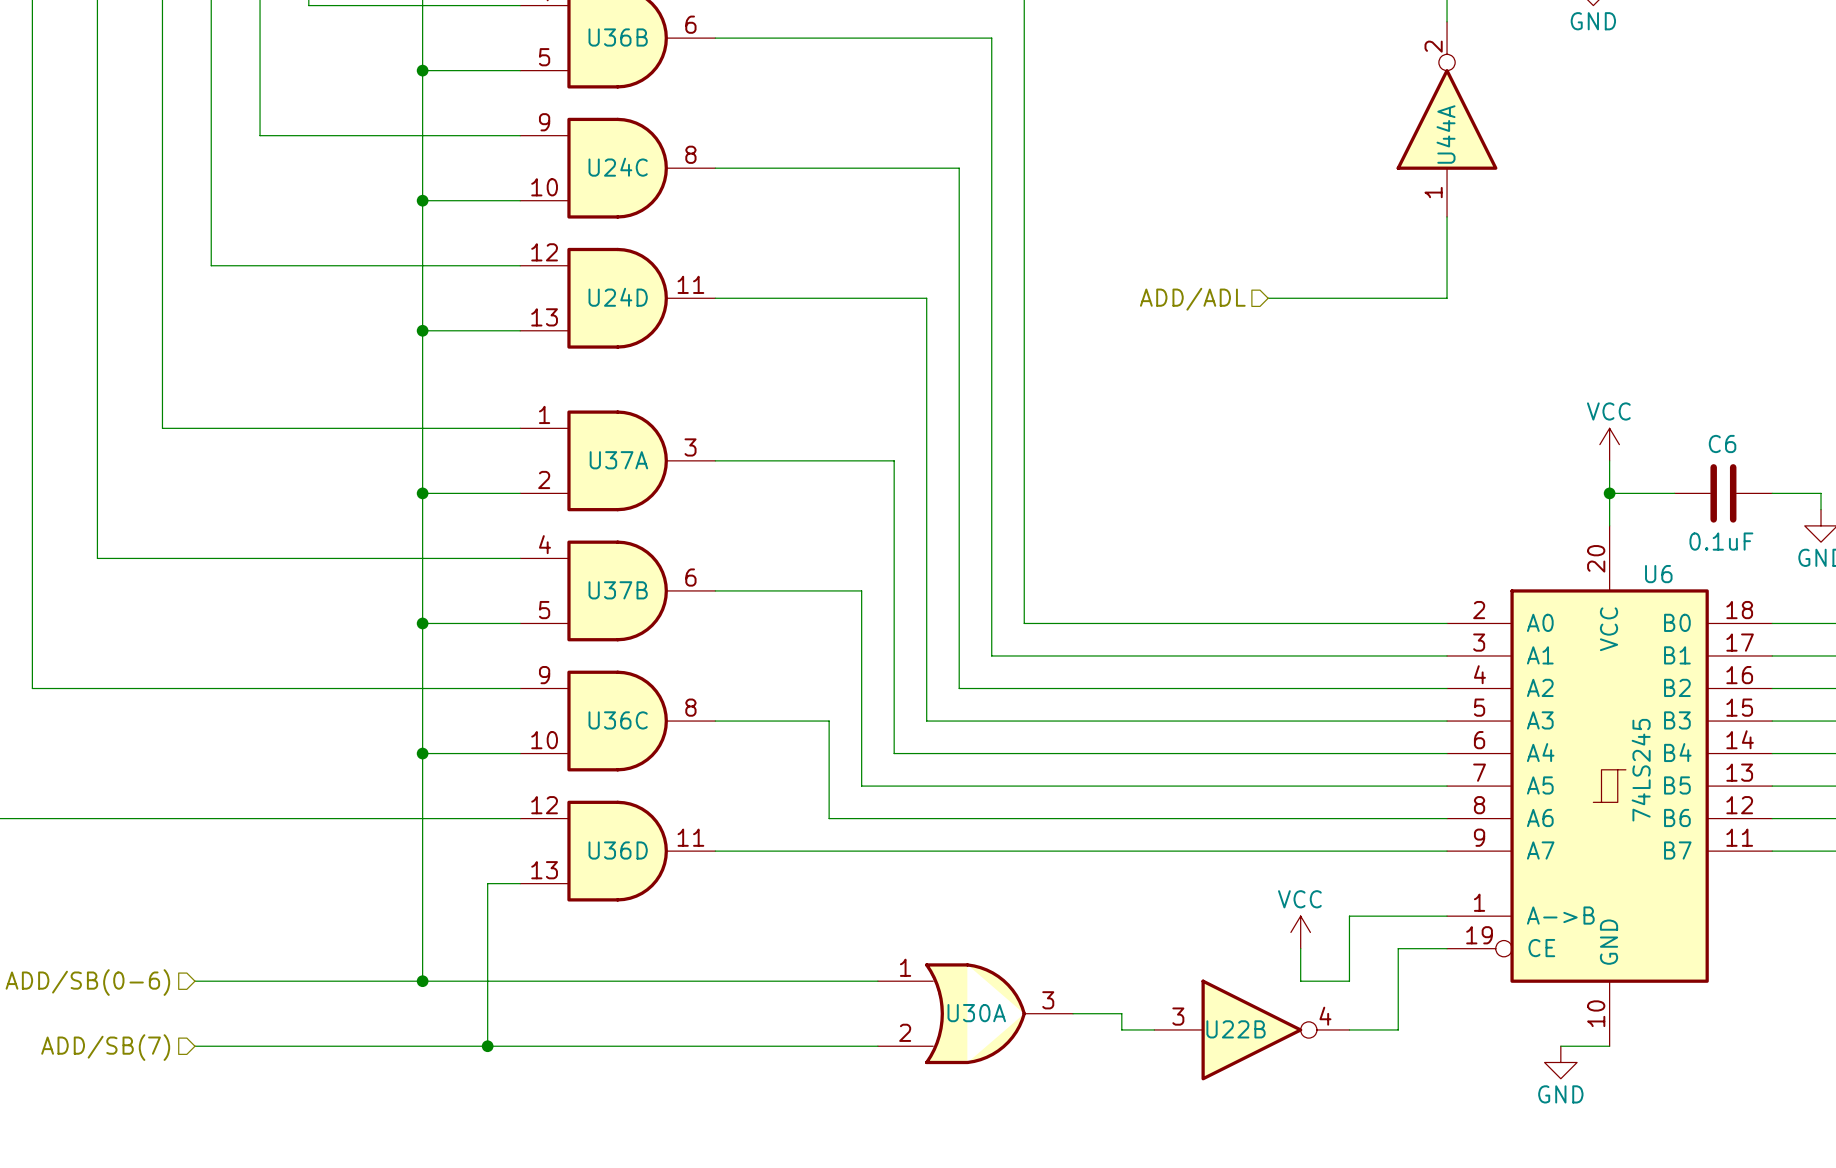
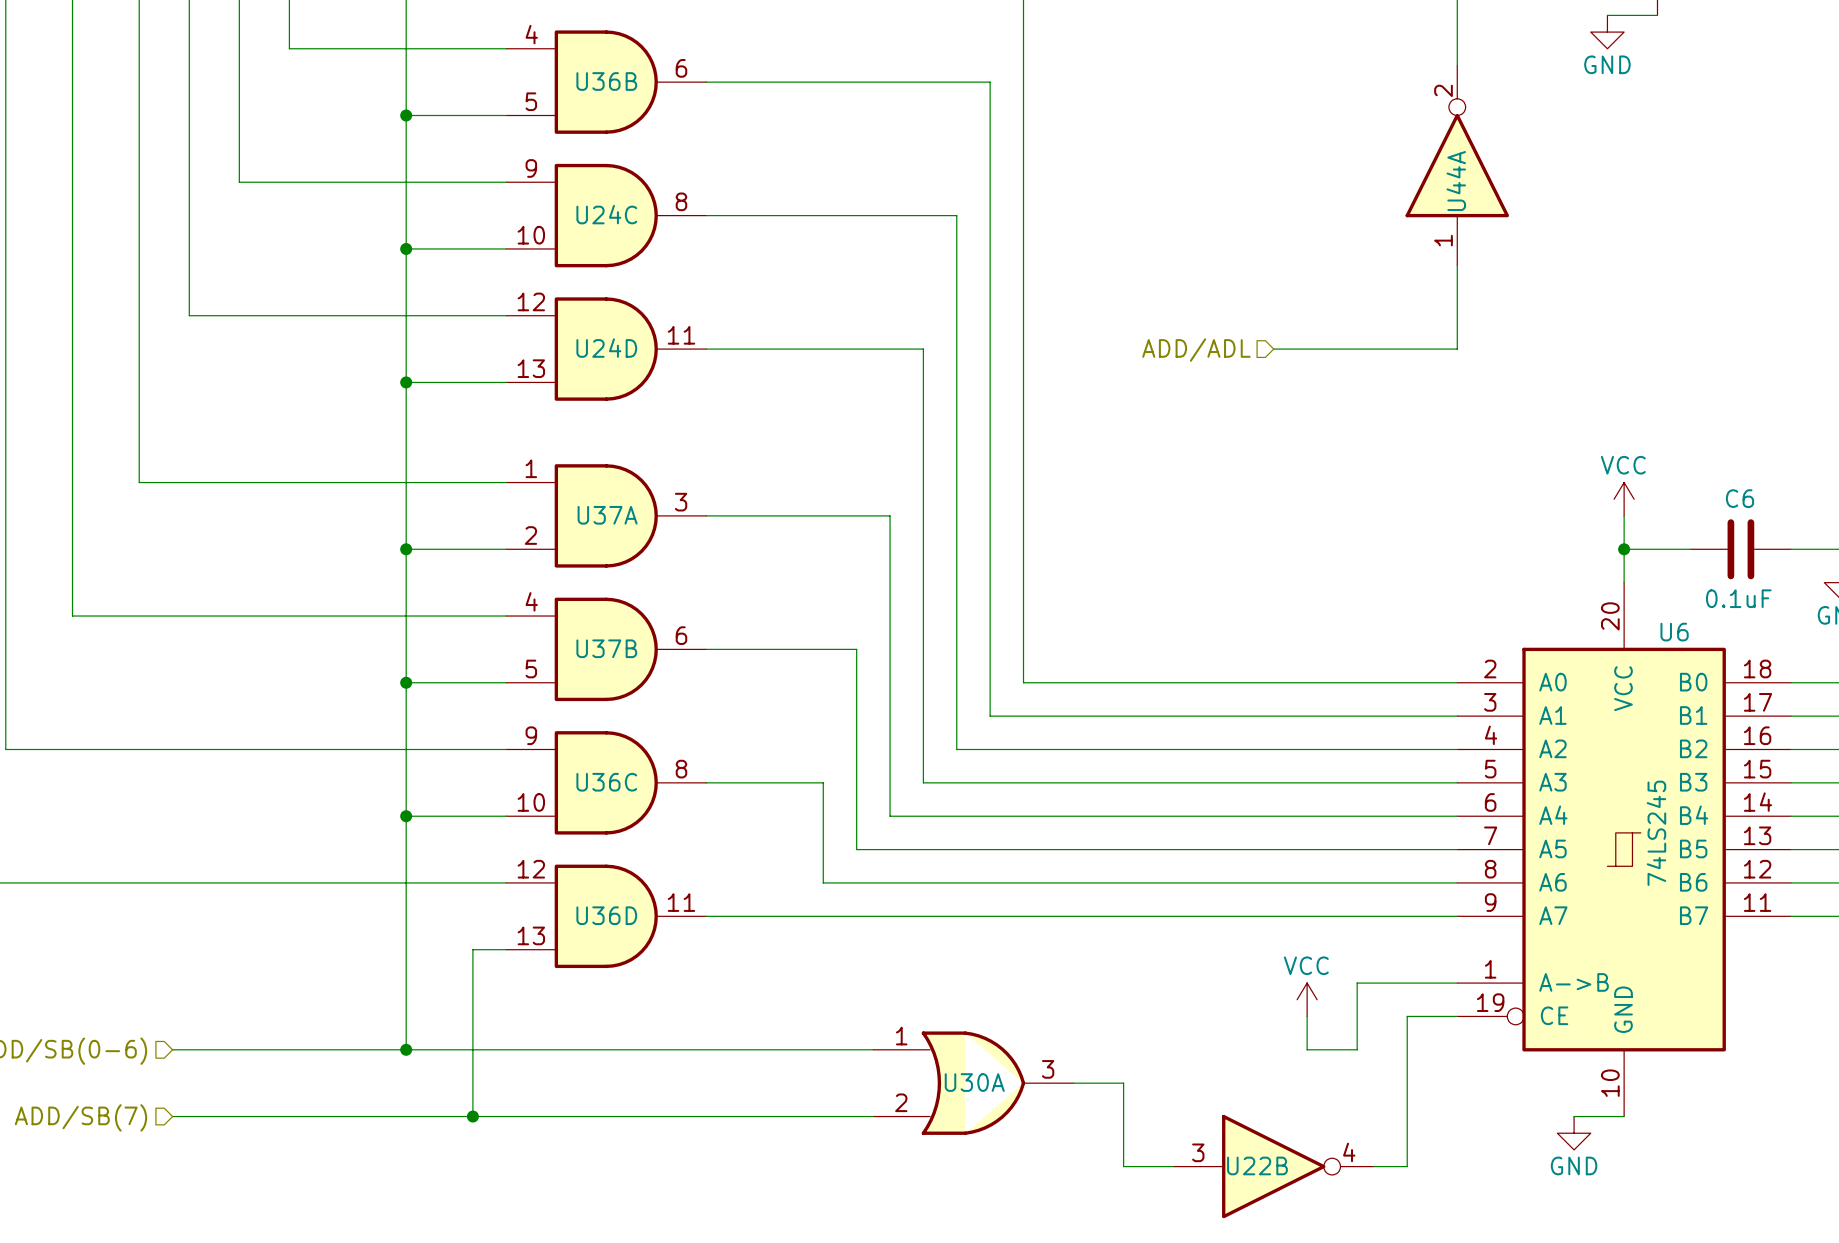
wire: (1121, 1029) (1154, 1029) -> (1123, 1099) (1123, 1166) (1173, 1166)
U22B position: (1251, 1029) -> (1273, 1166)
wire: (1349, 1029) (1398, 1029) -> (1373, 1166) (1407, 1166) (1407, 1099)

